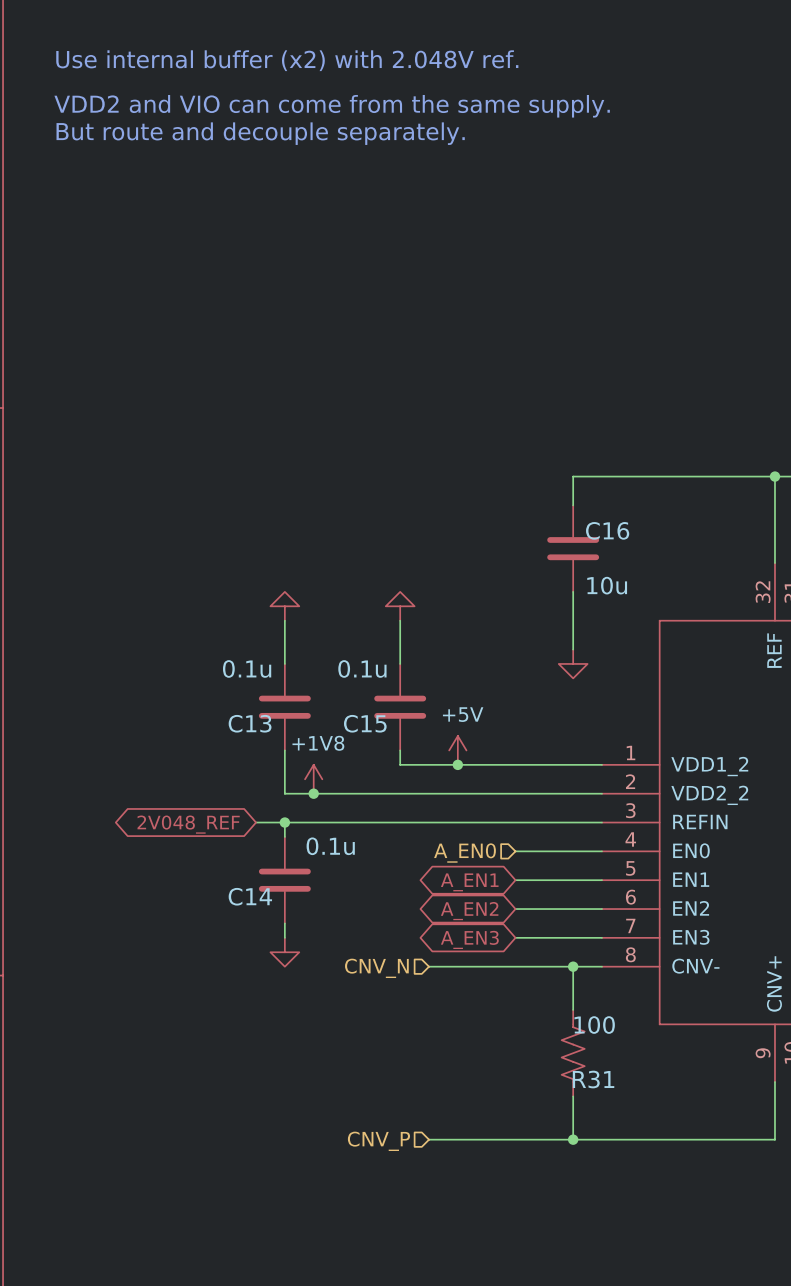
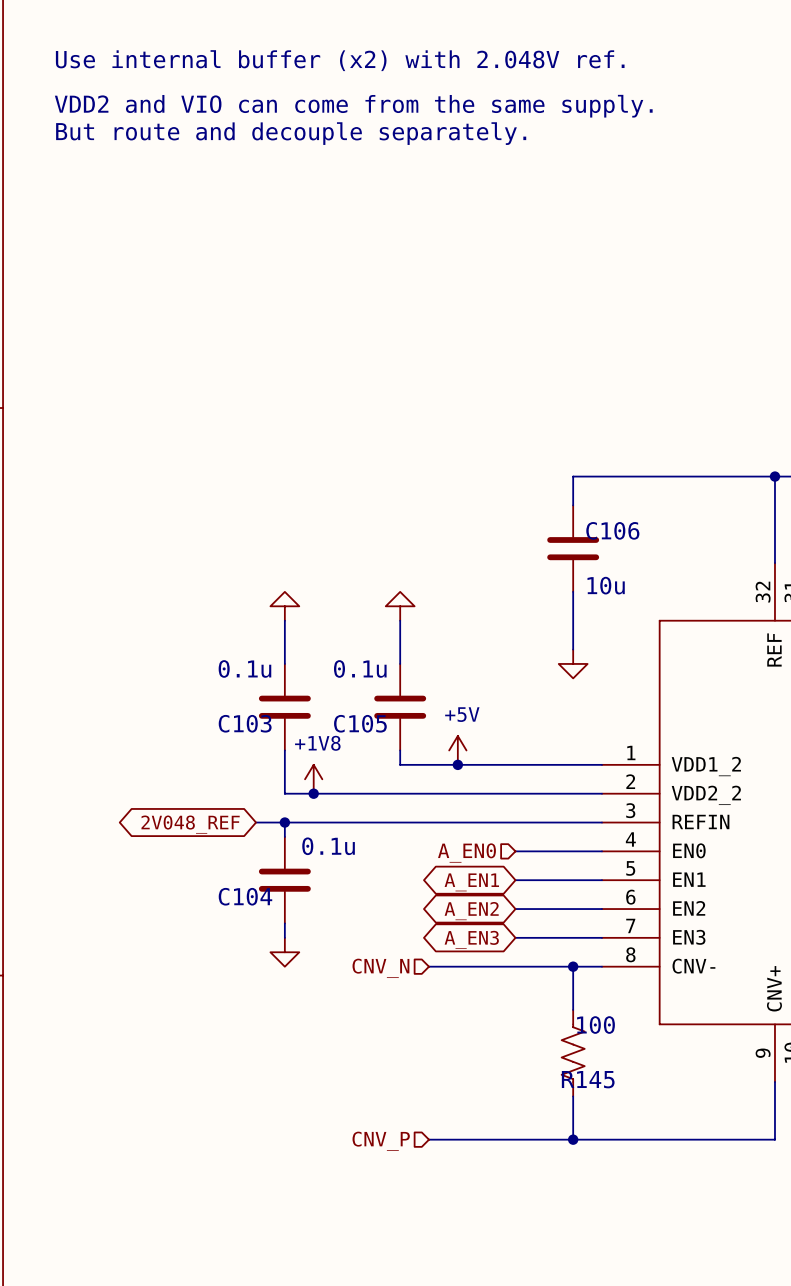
C16 name: C16 (607, 530) -> C106 (612, 530)
C13 name: C13 (250, 723) -> C103 (245, 723)
C15 name: C15 (365, 723) -> C105 (360, 723)
C14 name: C14 (250, 896) -> C104 (245, 896)
R31 name: R31 (593, 1079) -> R145 (588, 1079)

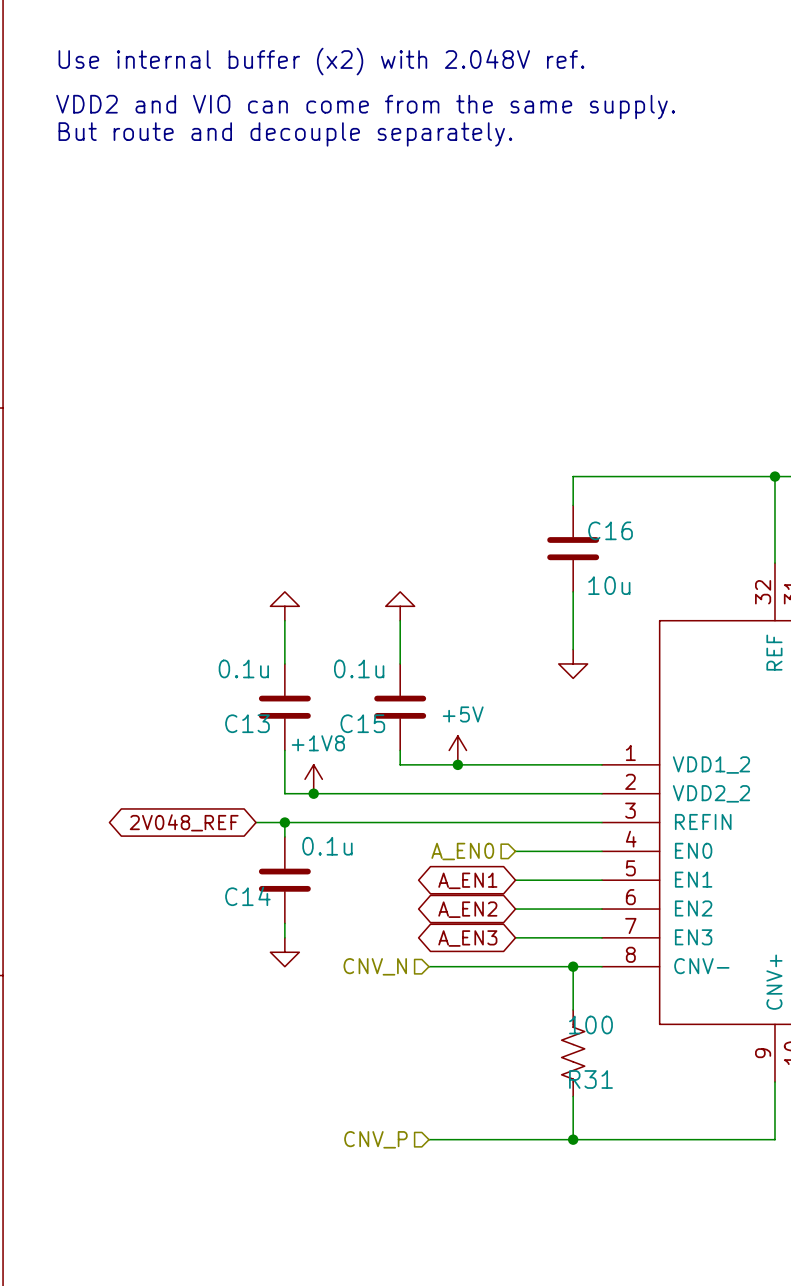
C106 name: C106 (612, 530) -> C16 (610, 530)
C103 name: C103 (245, 723) -> C13 (247, 723)
C105 name: C105 (360, 723) -> C15 (362, 723)
C104 name: C104 (245, 896) -> C14 (247, 896)
R145 name: R145 (588, 1079) -> R31 (590, 1079)

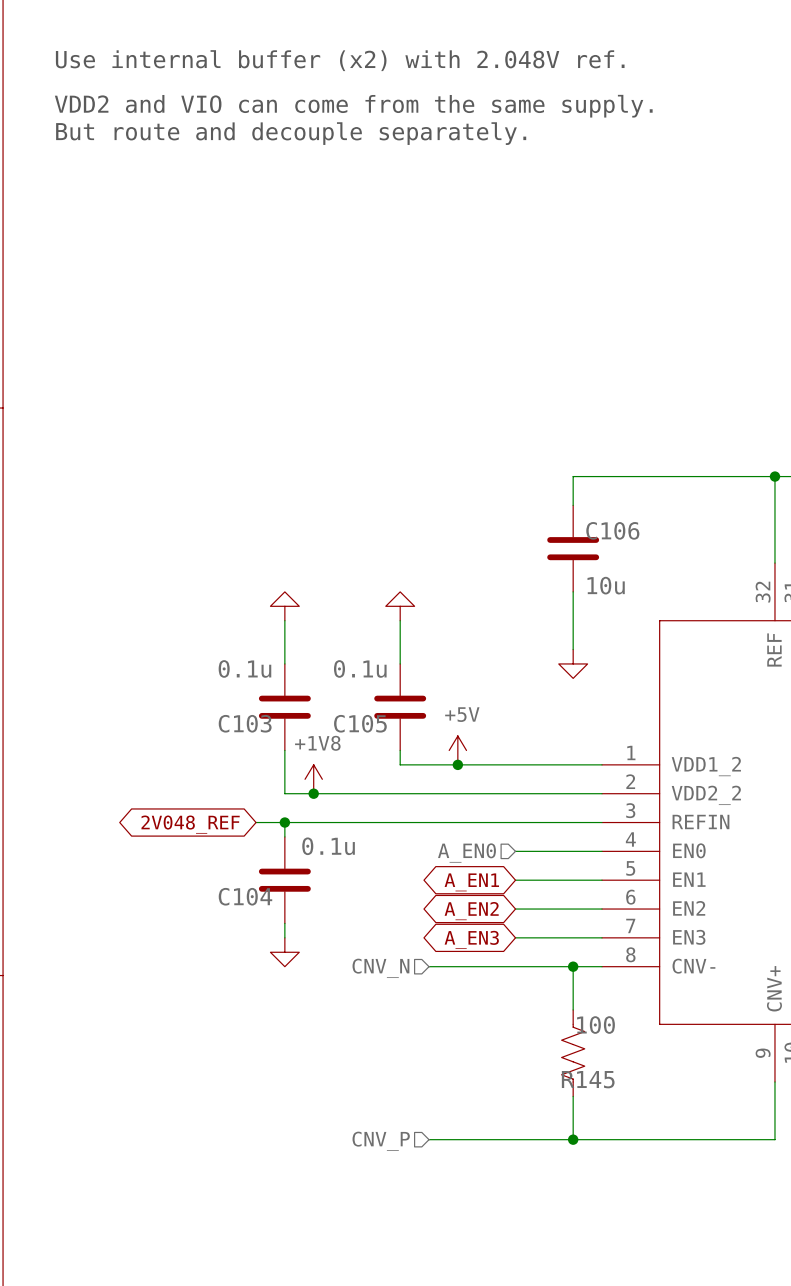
C16 name: C16 (610, 530) -> C106 (612, 530)
C13 name: C13 (247, 723) -> C103 (245, 723)
C15 name: C15 (362, 723) -> C105 (360, 723)
C14 name: C14 (247, 896) -> C104 (245, 896)
R31 name: R31 (590, 1079) -> R145 (588, 1079)

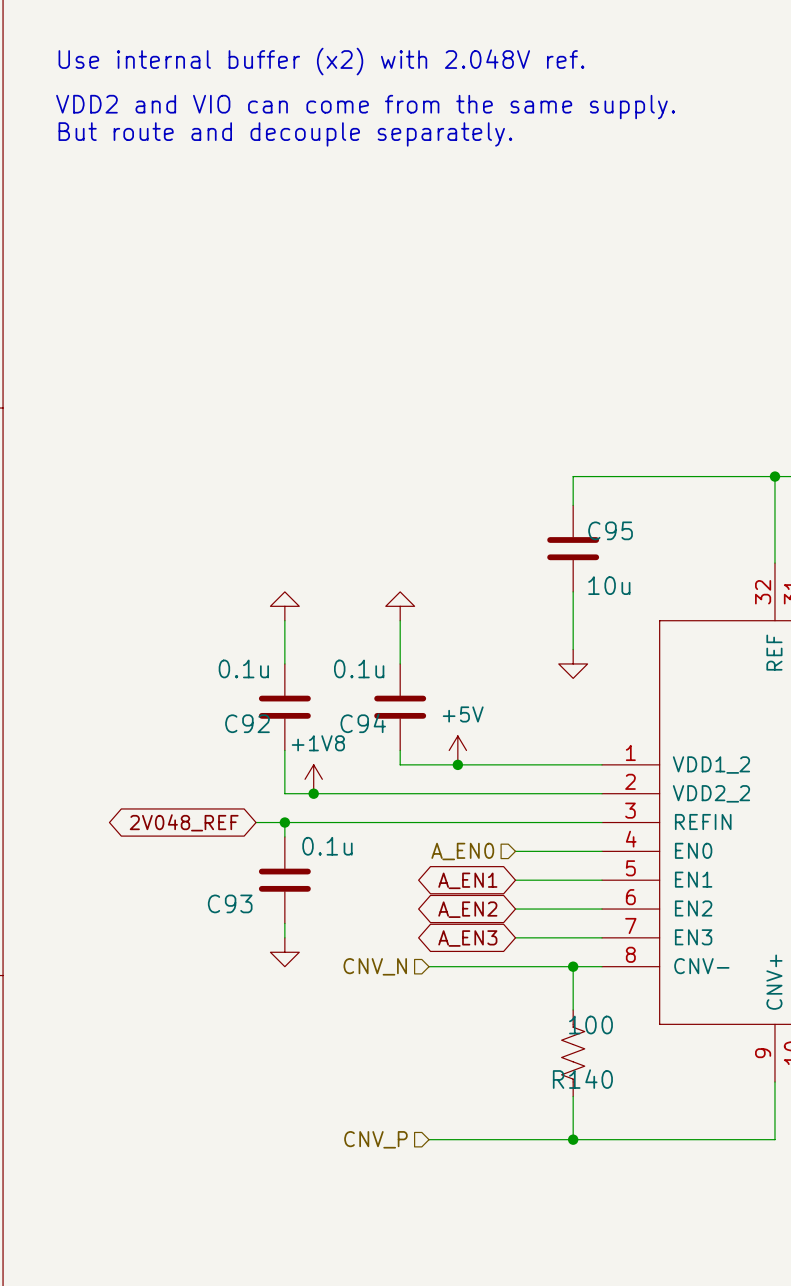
C106 name: C106 (612, 530) -> C95 (610, 530)
C103 name: C103 (245, 723) -> C92 (247, 723)
C105 name: C105 (360, 723) -> C94 (363, 723)
C104 name: C104 (245, 896) -> C93 (230, 903)
R145 name: R145 (588, 1079) -> R140 (582, 1079)

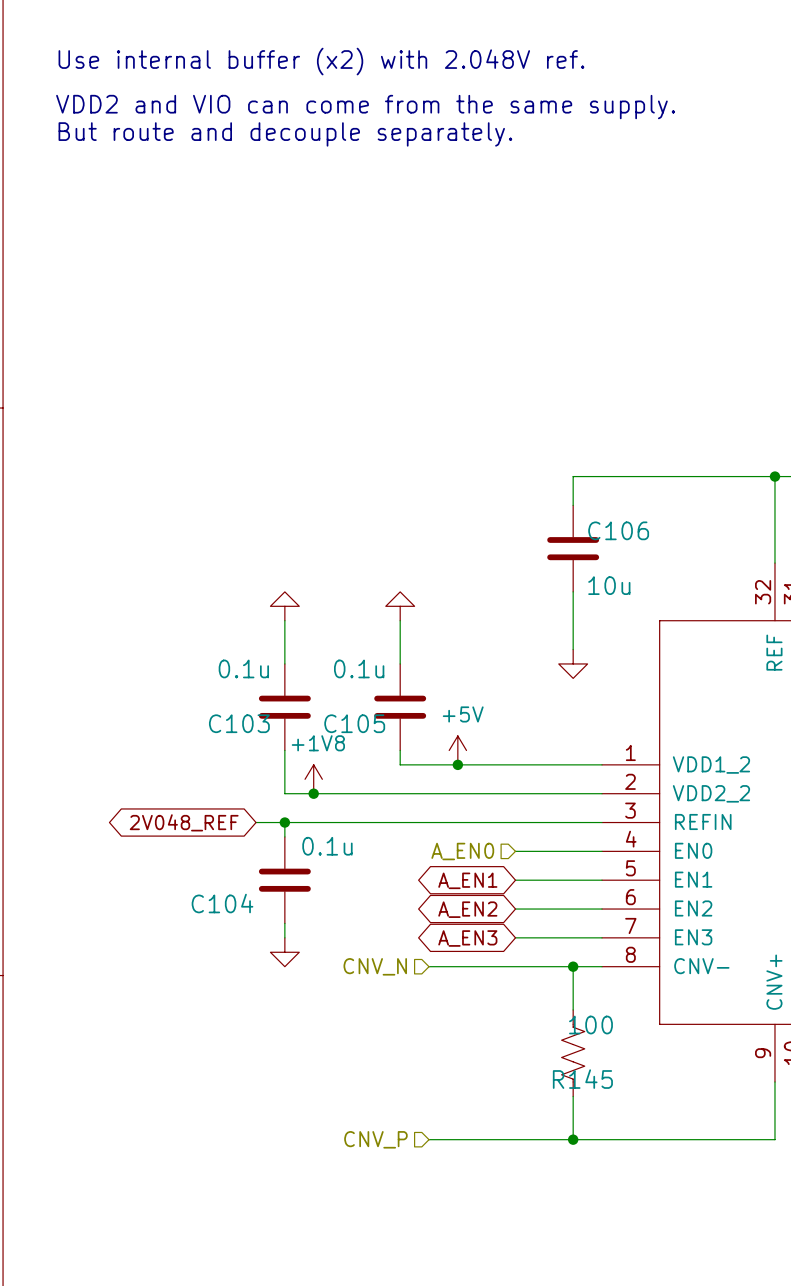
C95 name: C95 (610, 530) -> C106 (618, 530)
C92 name: C92 (247, 723) -> C103 (239, 723)
C94 name: C94 (363, 723) -> C105 (354, 723)
C93 name: C93 (230, 903) -> C104 (222, 903)
R140 name: R140 (582, 1079) -> R145 (582, 1079)

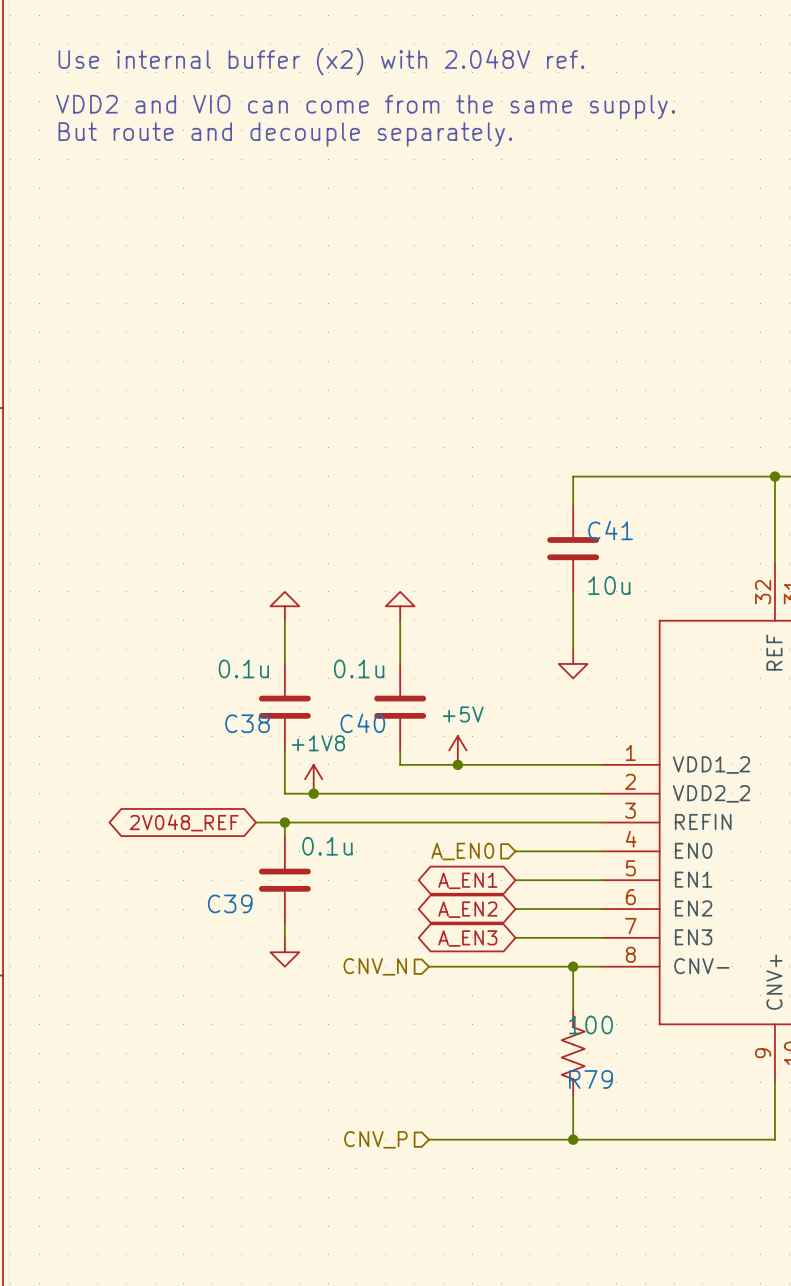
C106 name: C106 (618, 530) -> C41 (610, 530)
C103 name: C103 (239, 723) -> C38 (247, 723)
C105 name: C105 (354, 723) -> C40 (362, 723)
C104 name: C104 (222, 903) -> C39 (230, 903)
R145 name: R145 (582, 1079) -> R79 (590, 1079)

